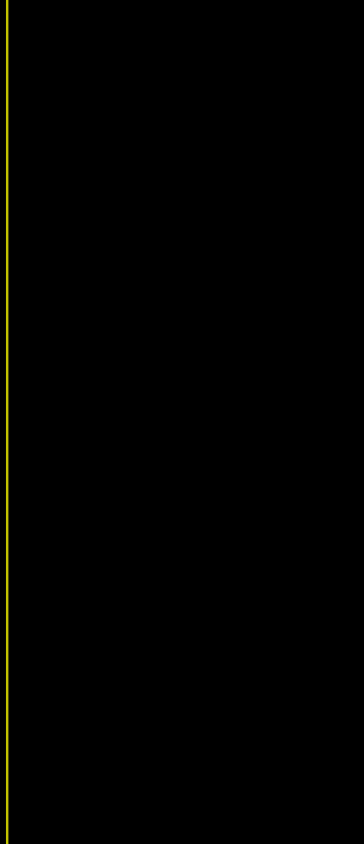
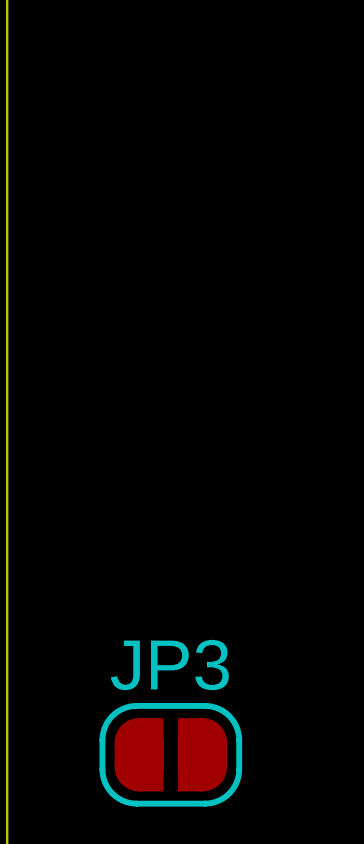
JP3: none -> (170, 754)

